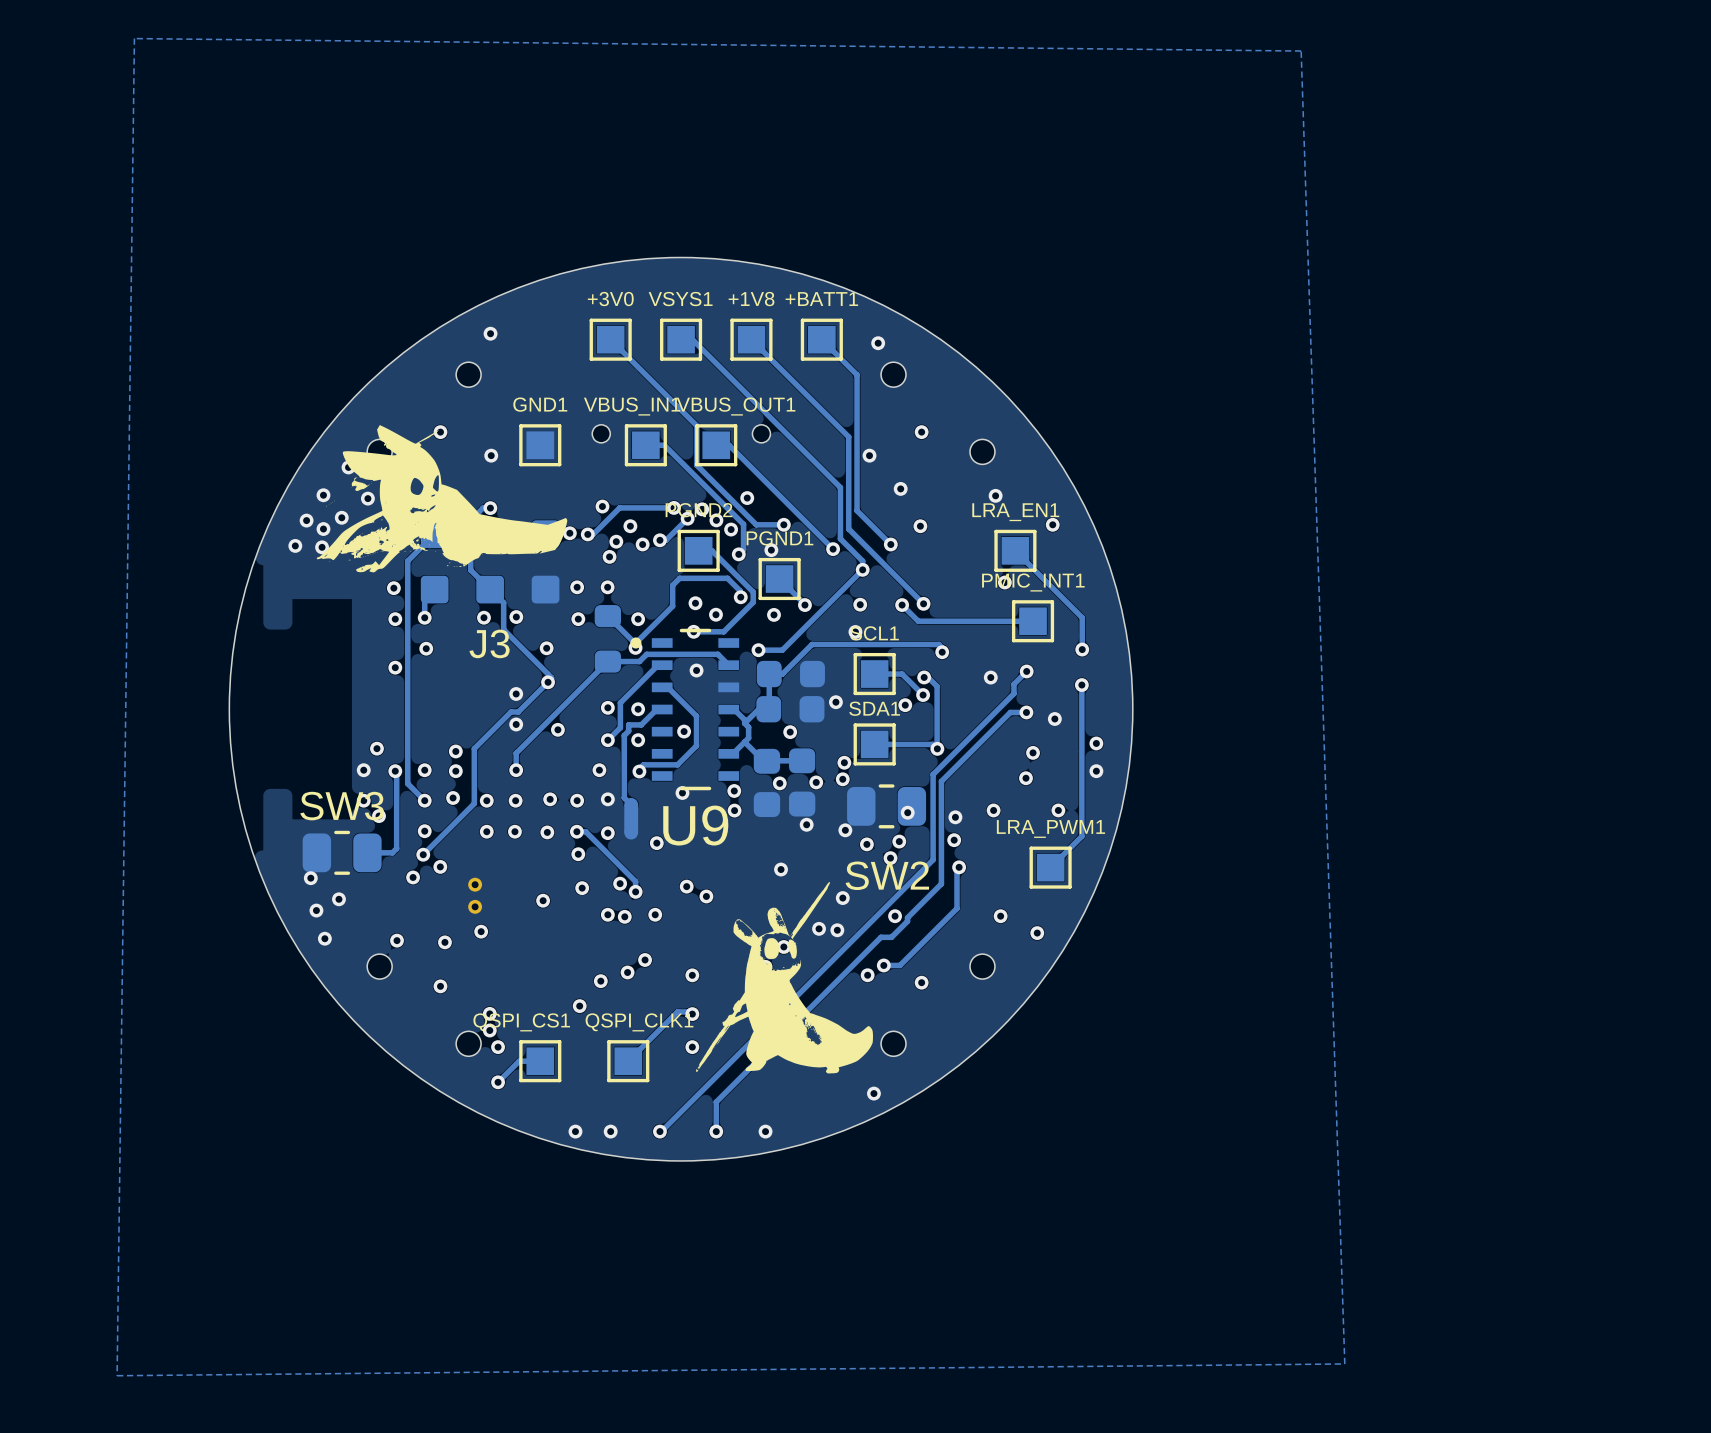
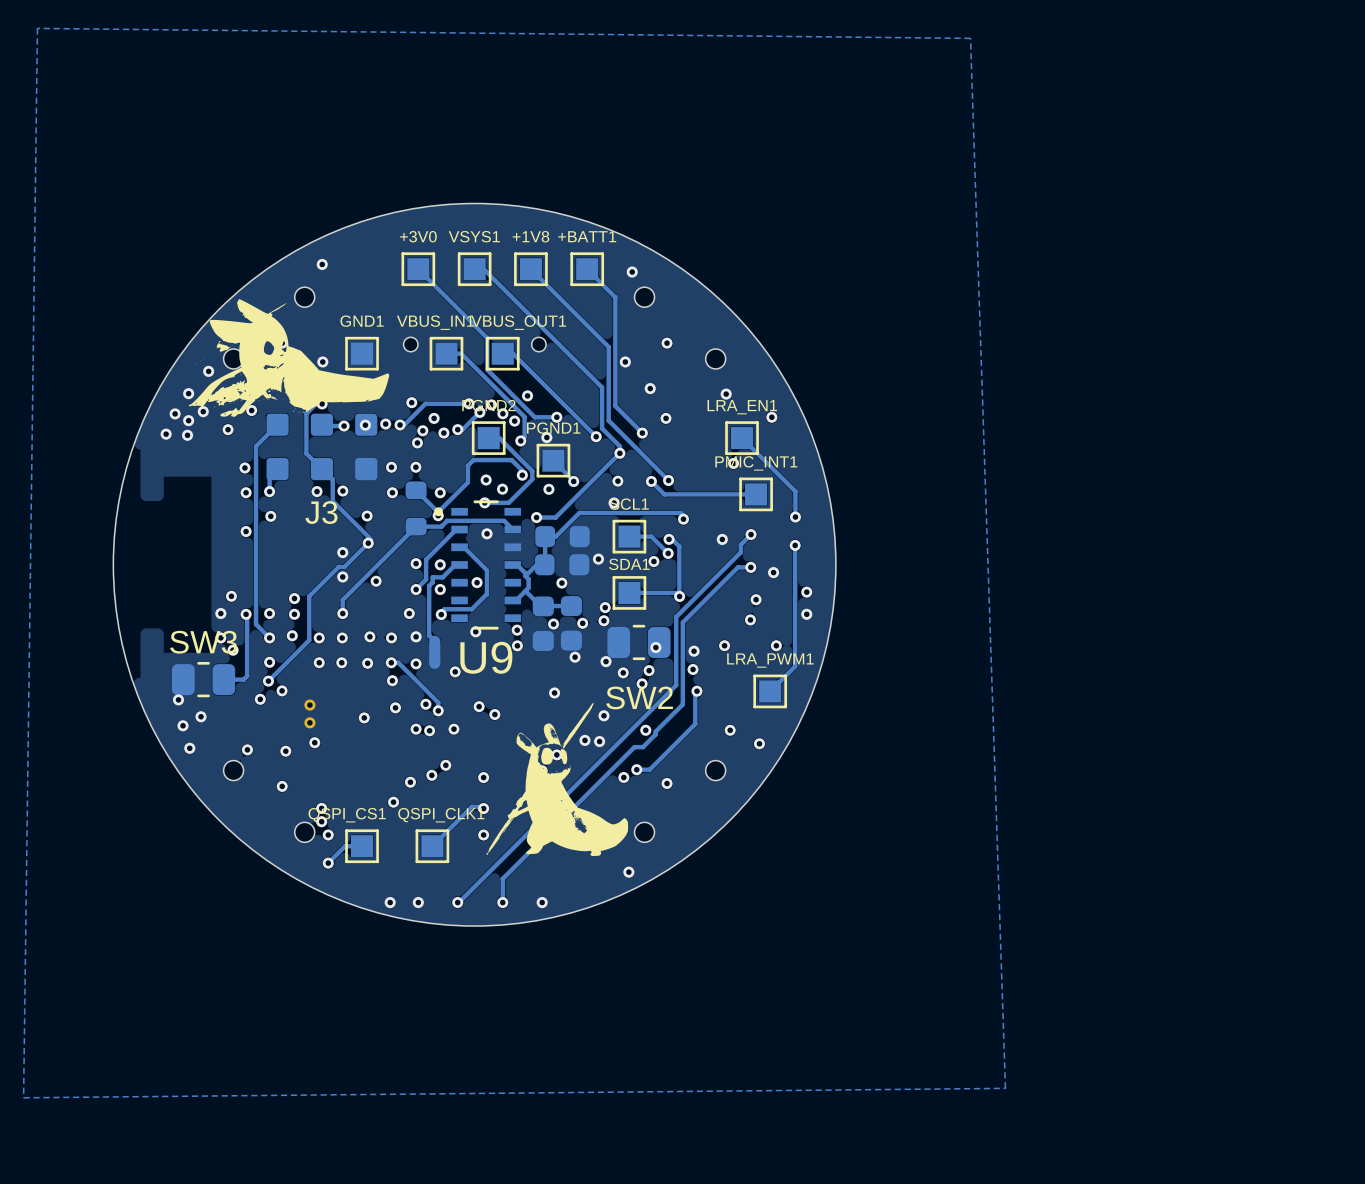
drawing position: (442, 498) -> (288, 357)

